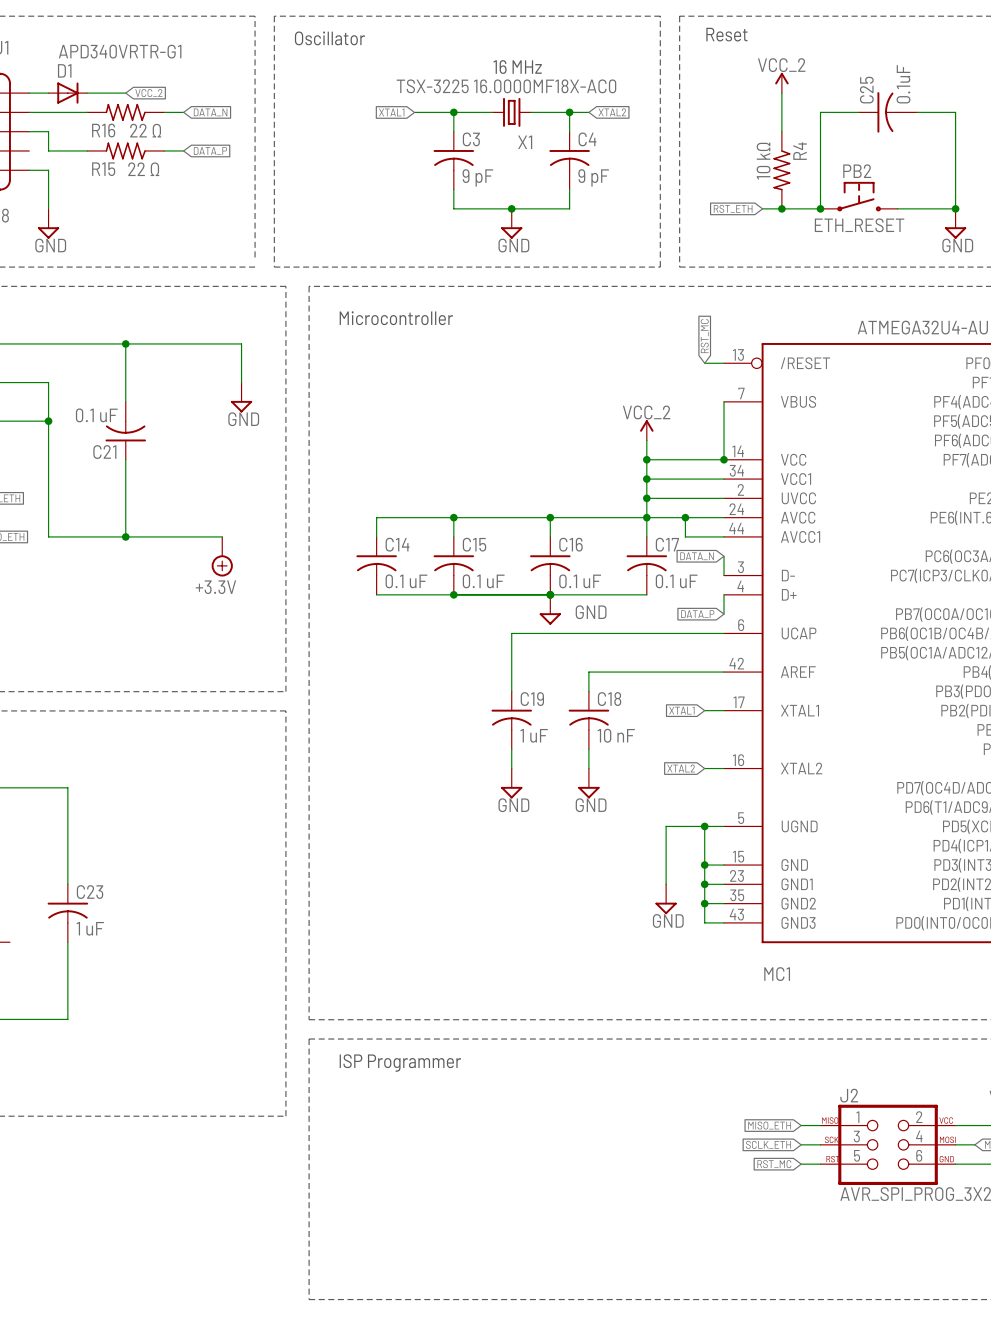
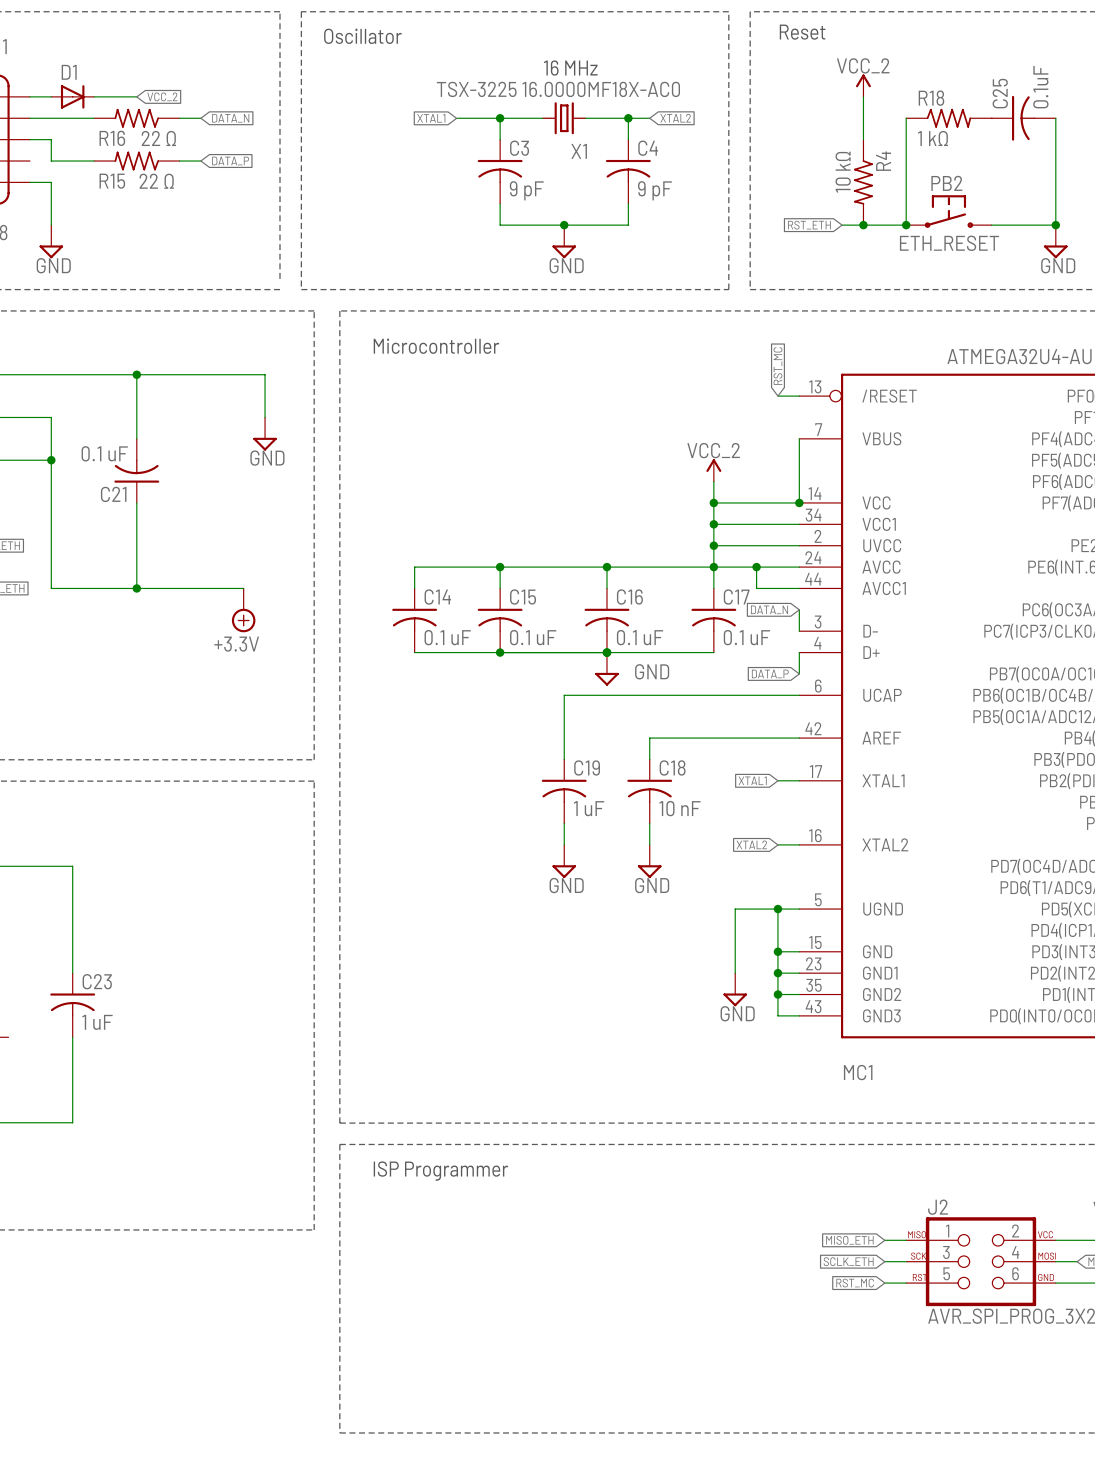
D1 value: APD340VRTR-G1 (120, 51) -> none
R18: none -> 1 kΩ (948, 118)
C25 position: (888, 112) -> (1023, 118)

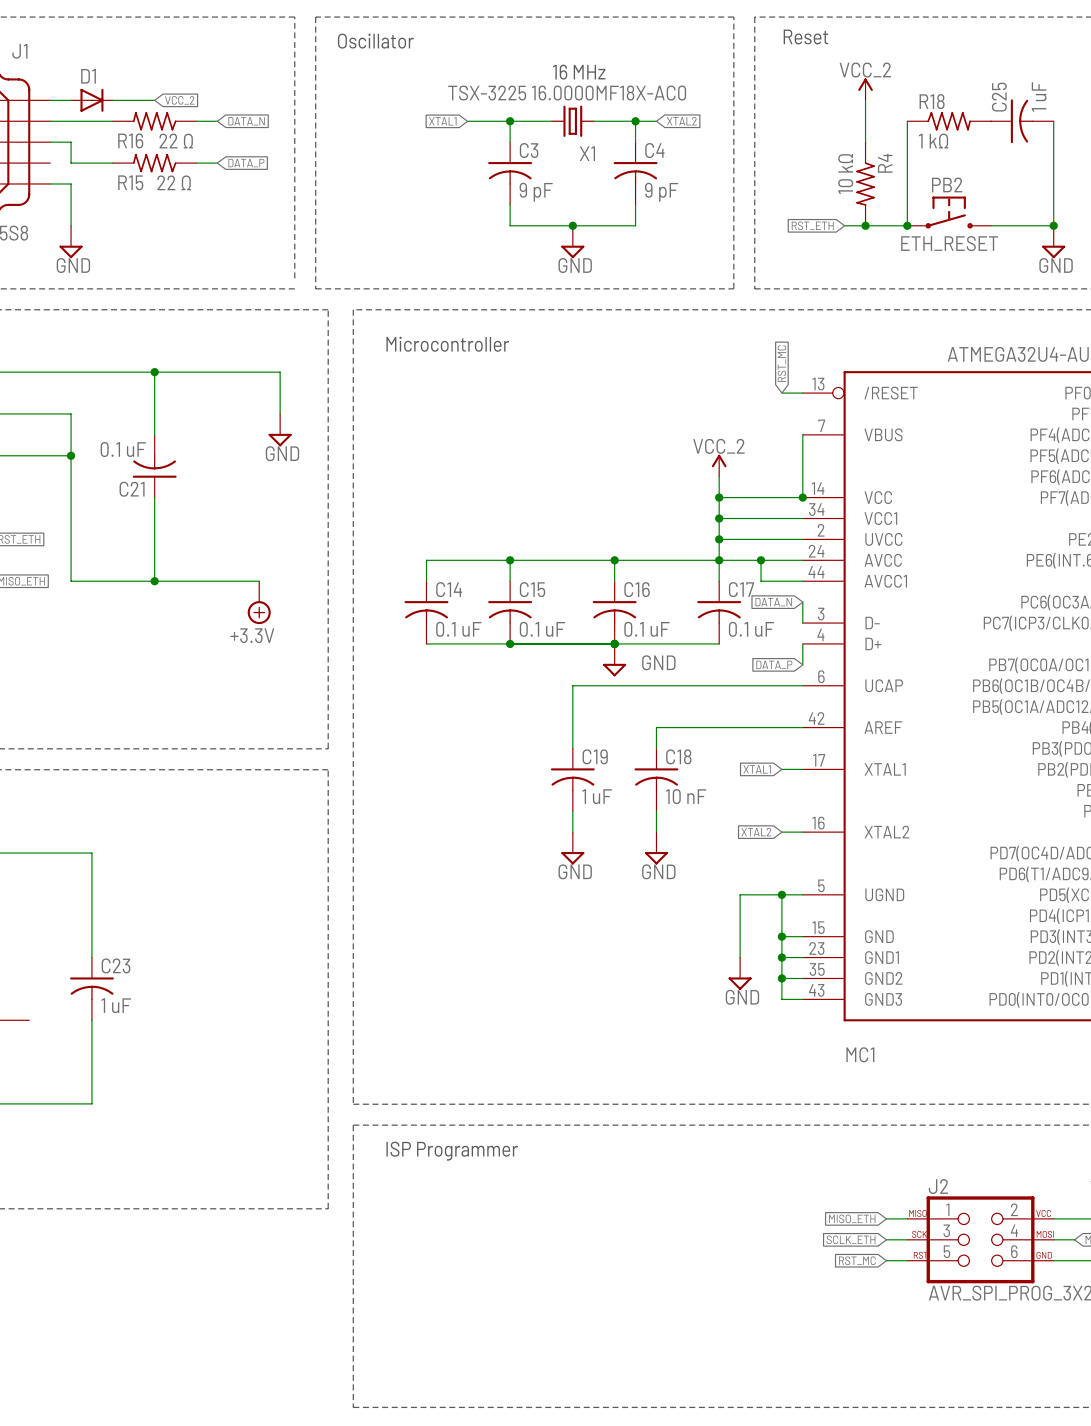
C25 value: 0.1uF (1040, 87) -> 1 uF (1039, 97)

